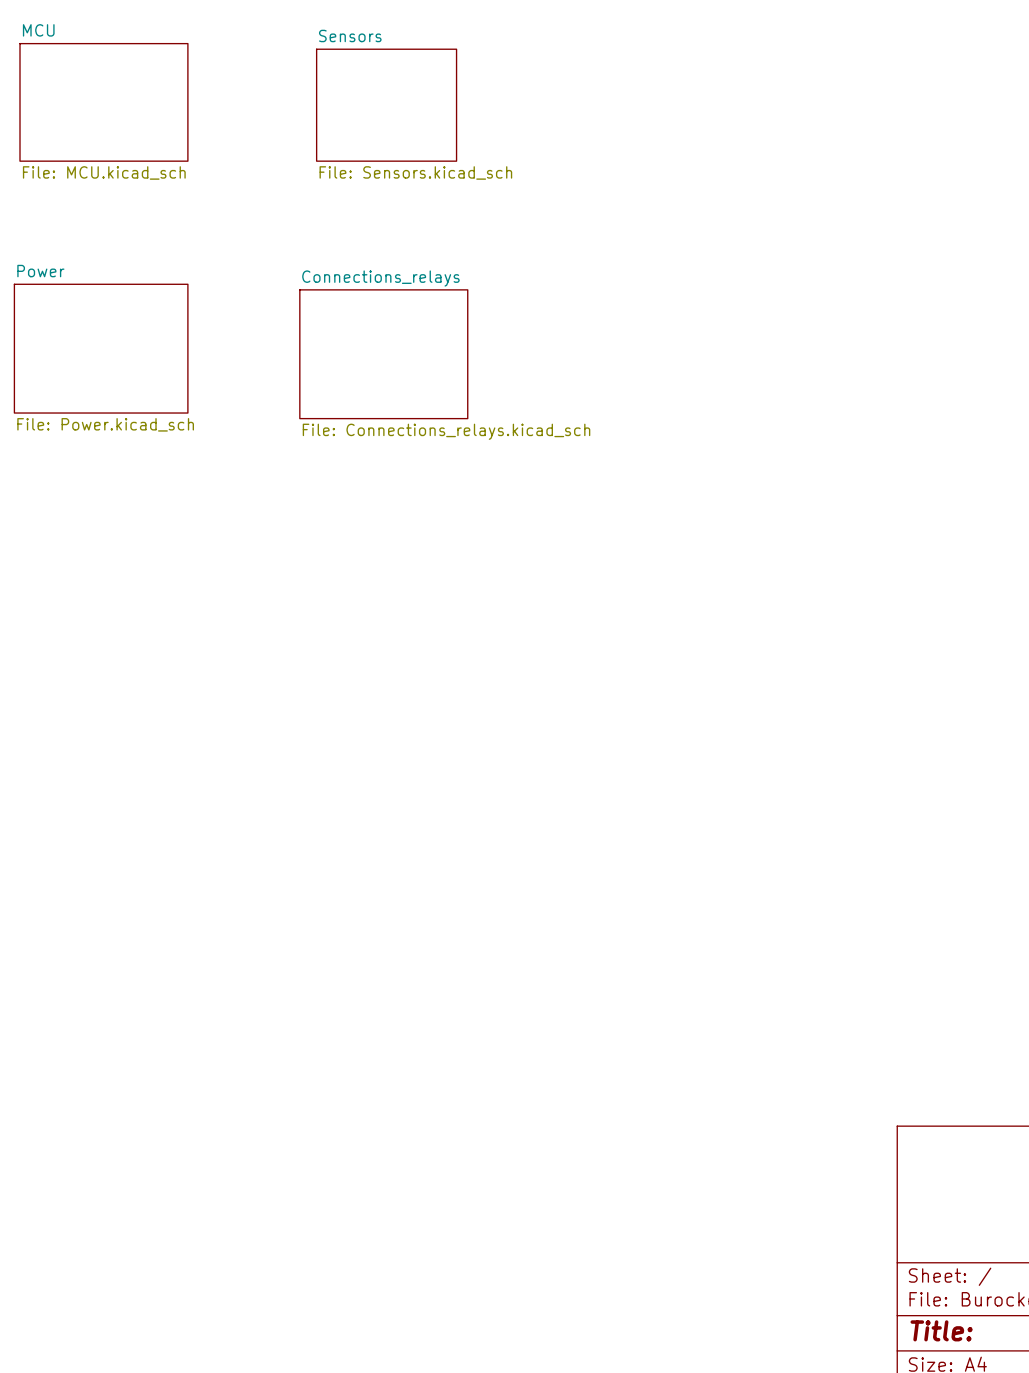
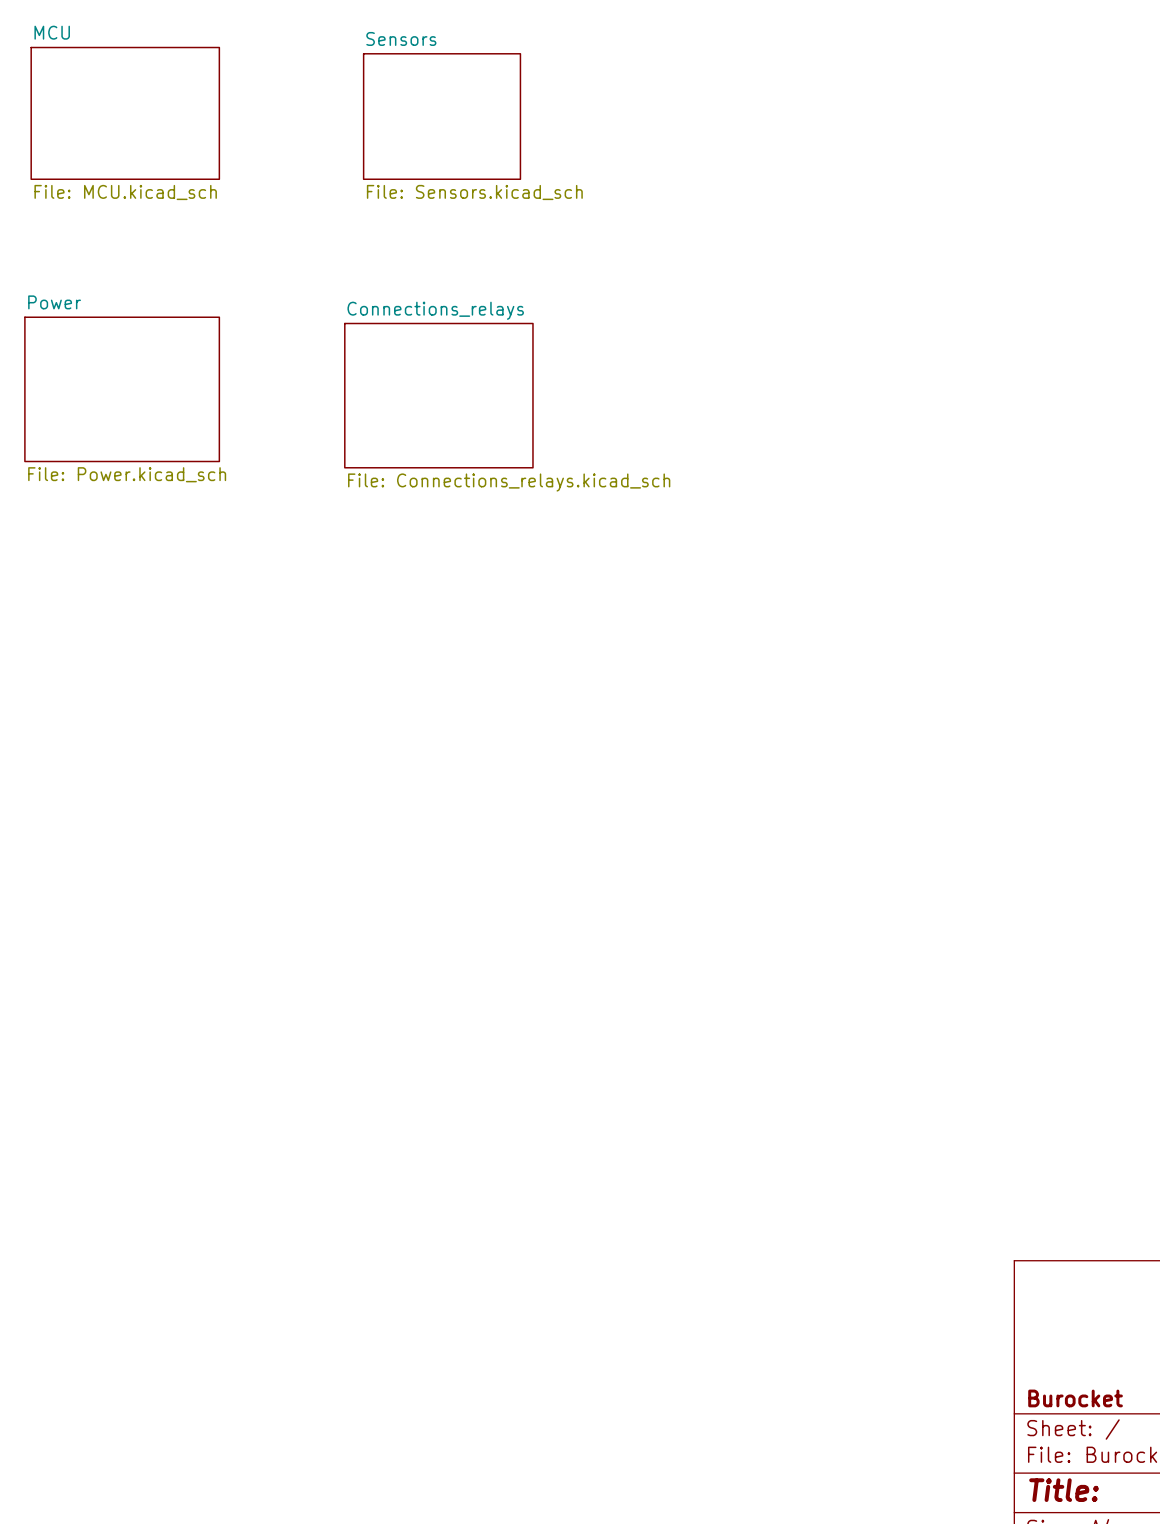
title block: none -> Burocket (1075, 1398)

